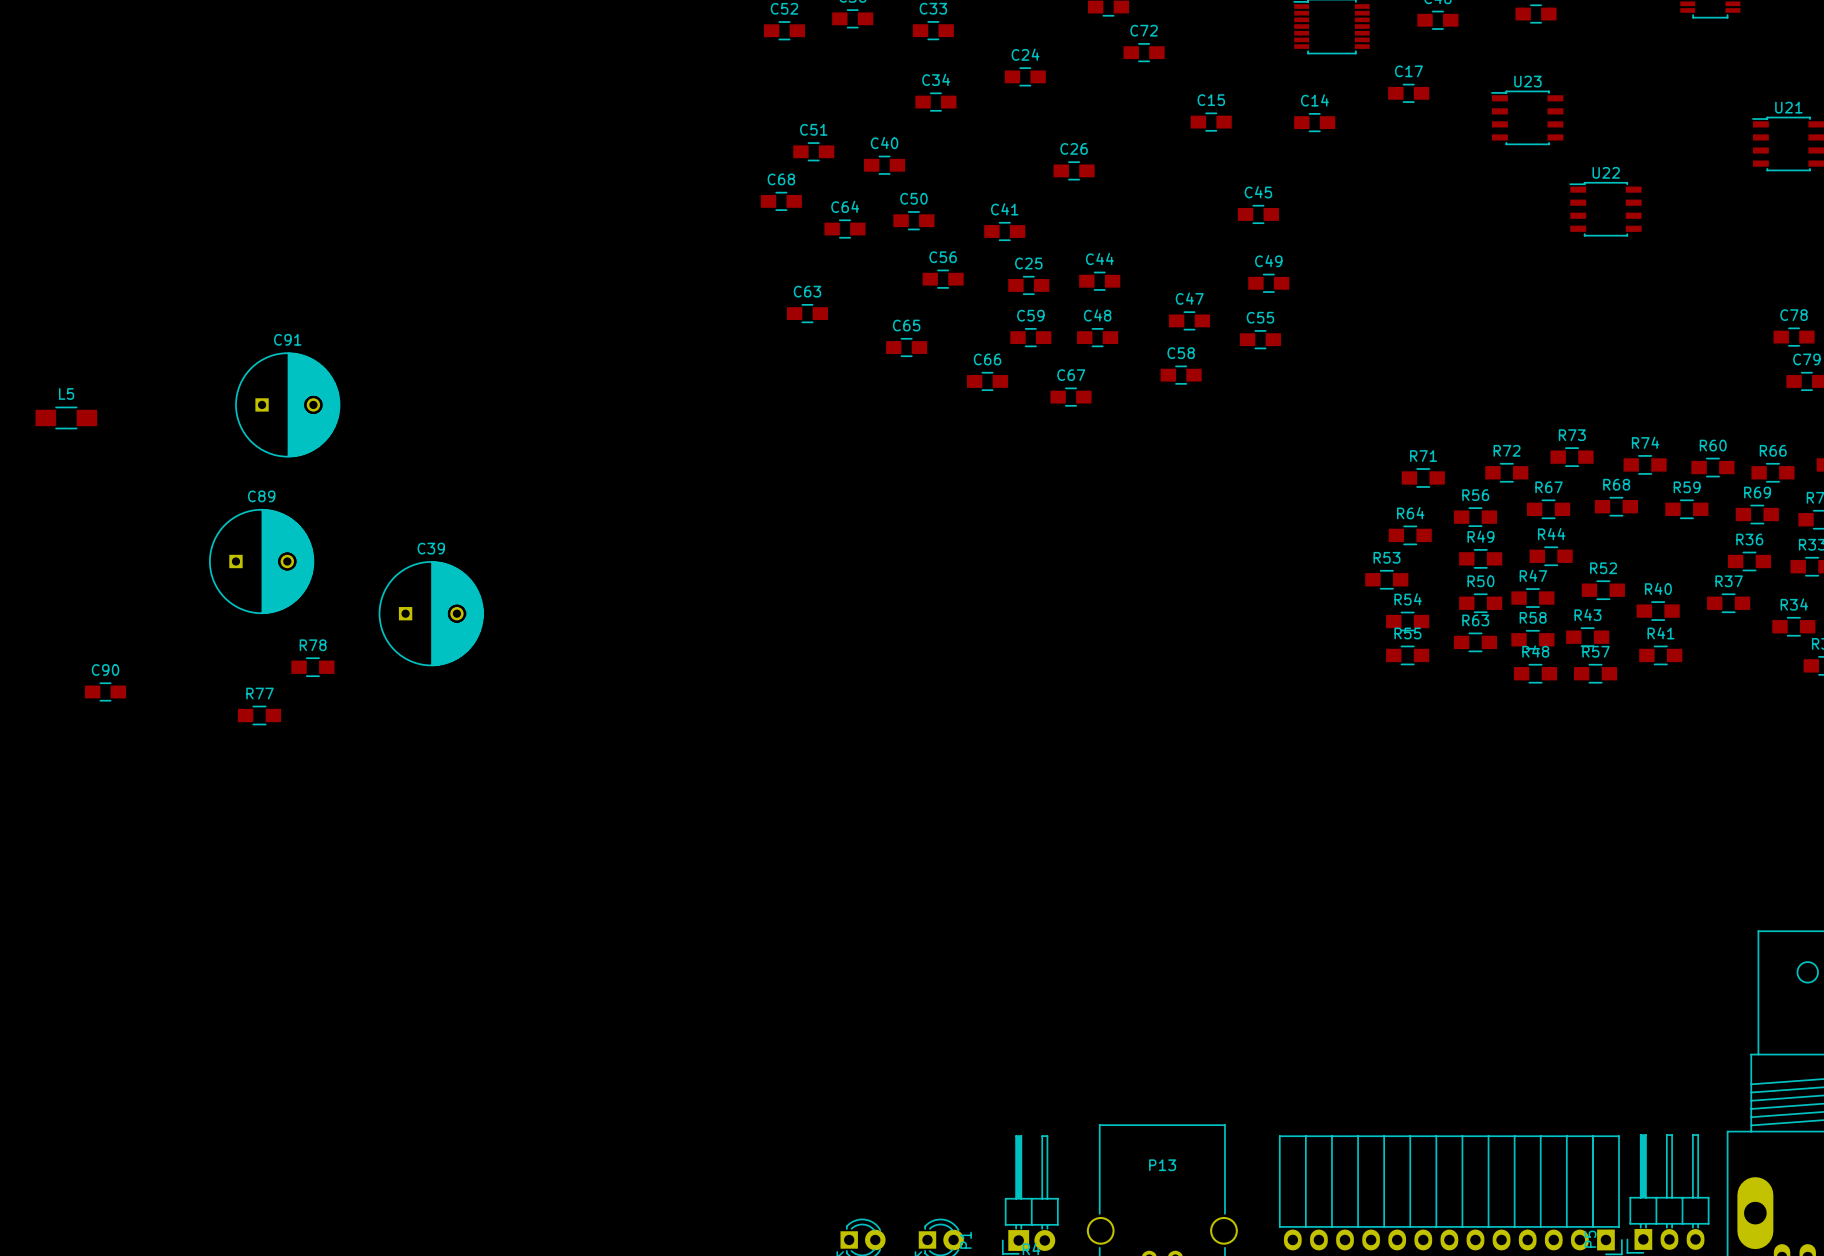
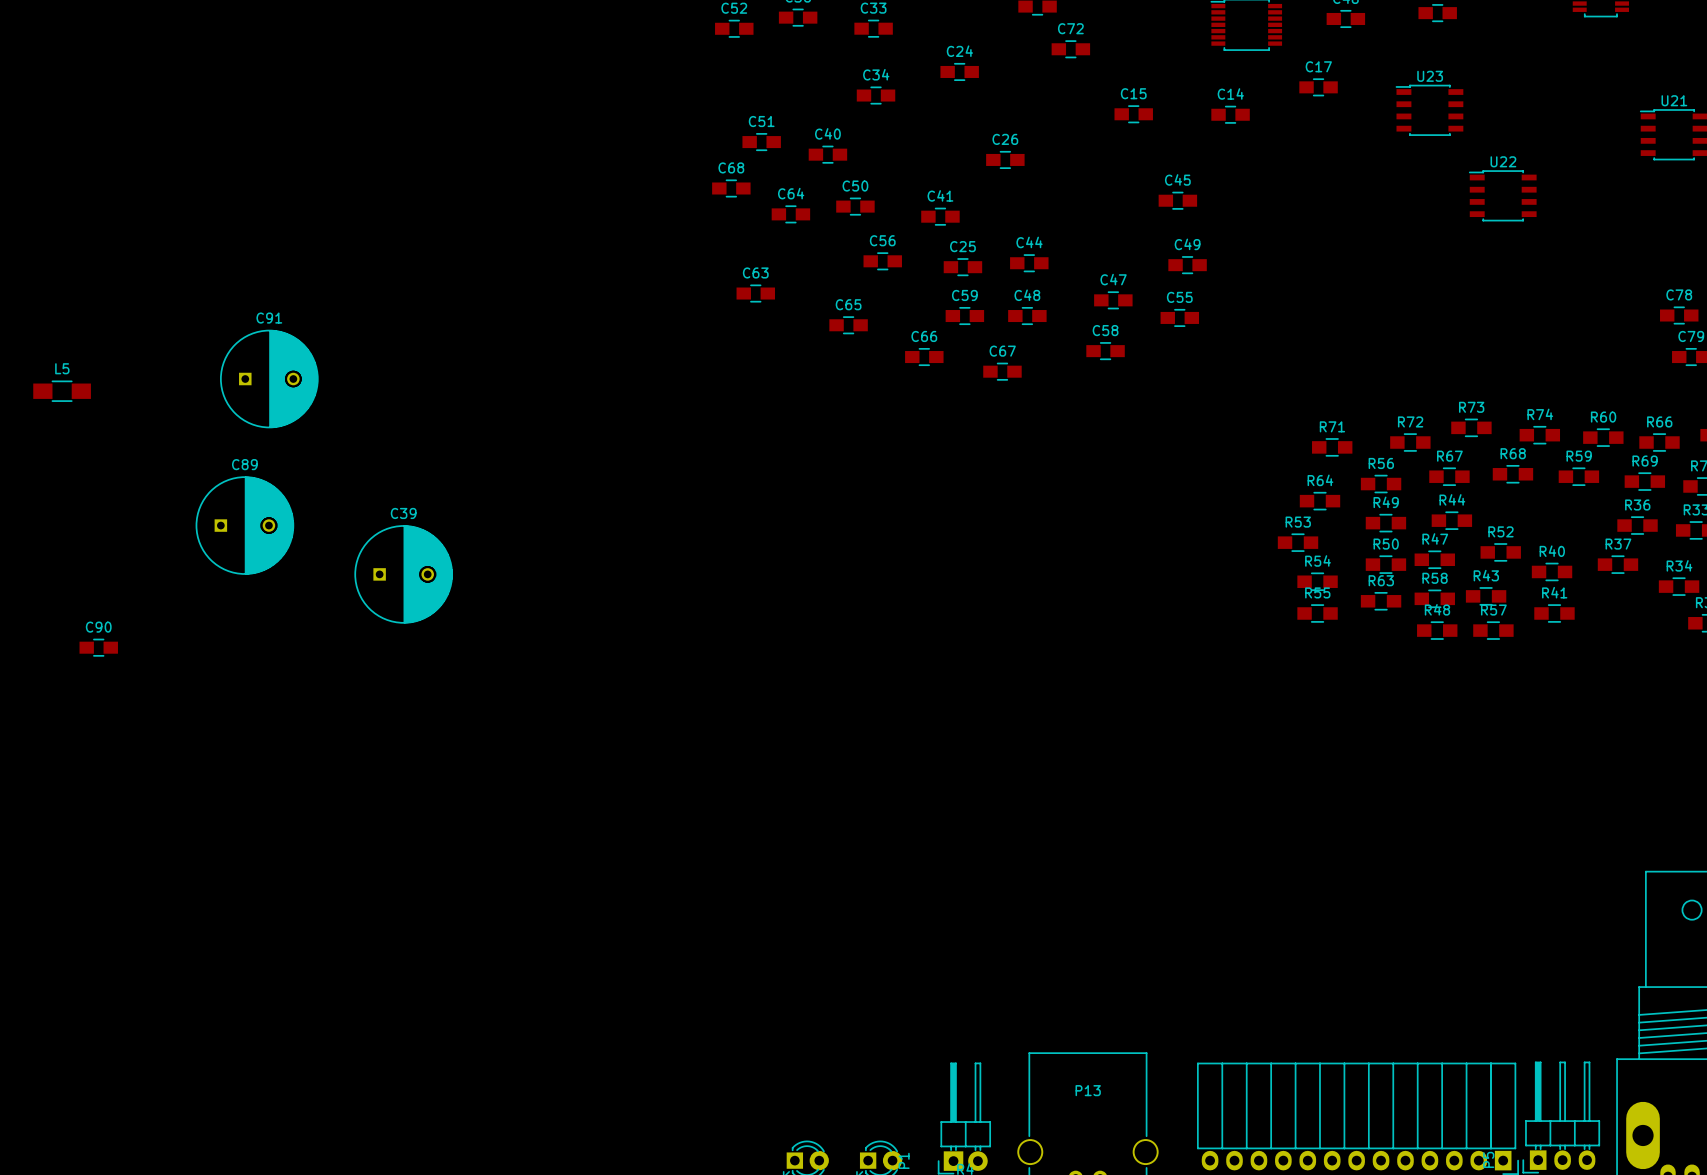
R78: (312, 667) -> none
R77: (259, 715) -> none

